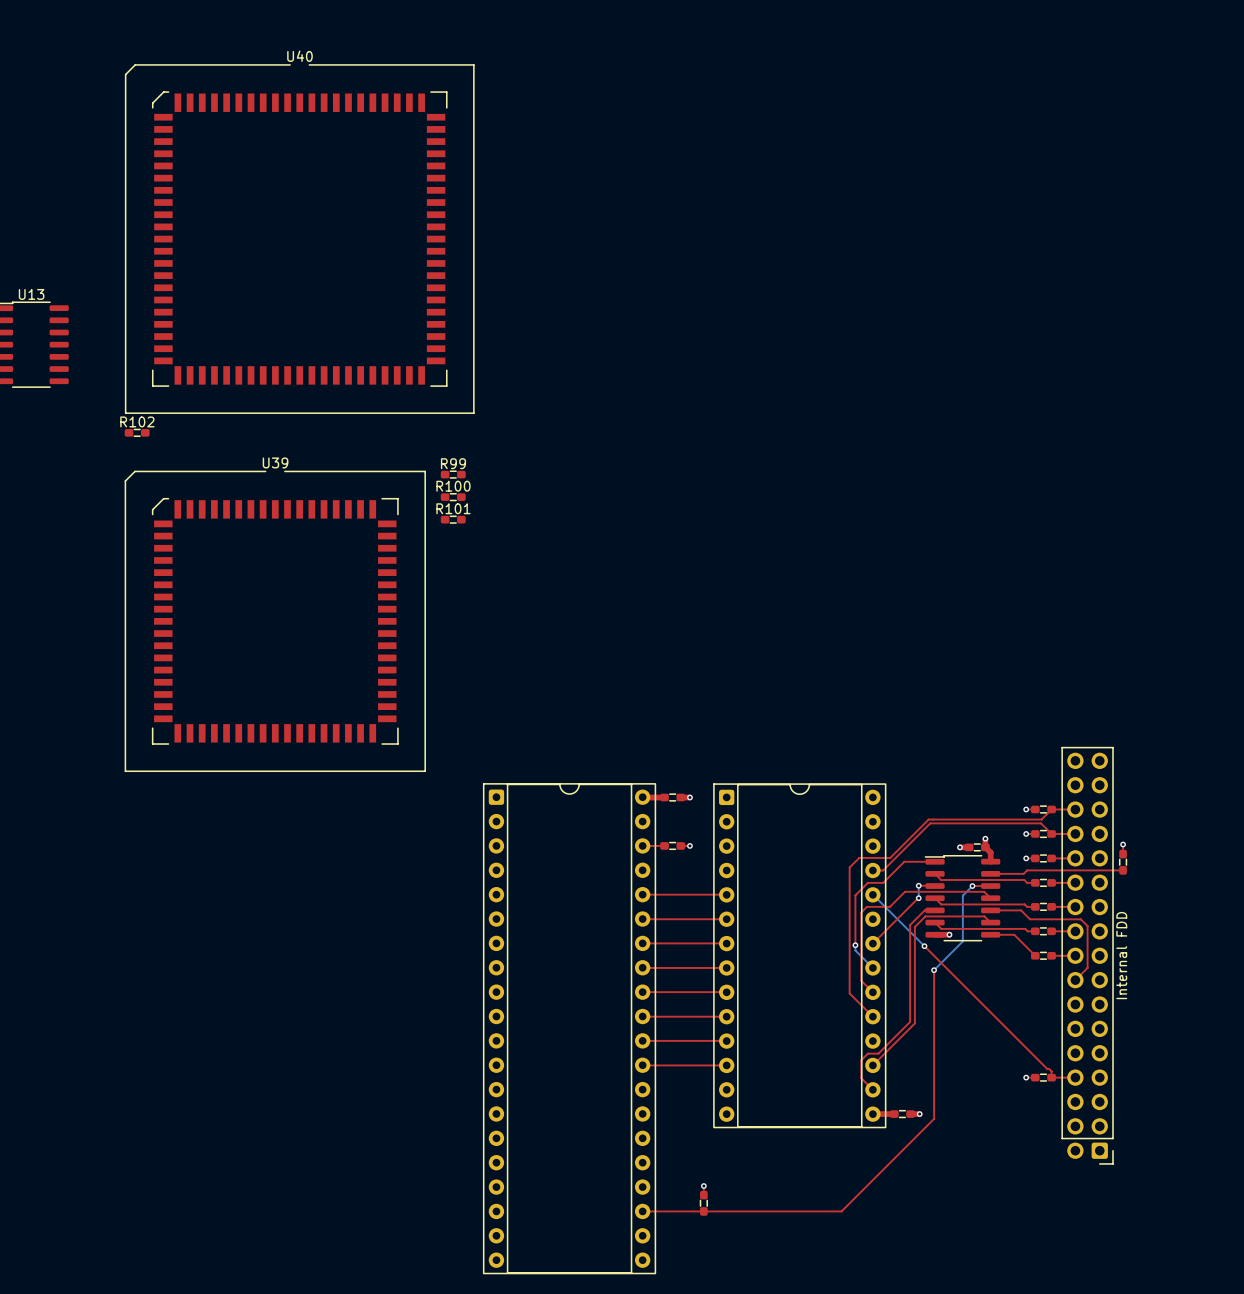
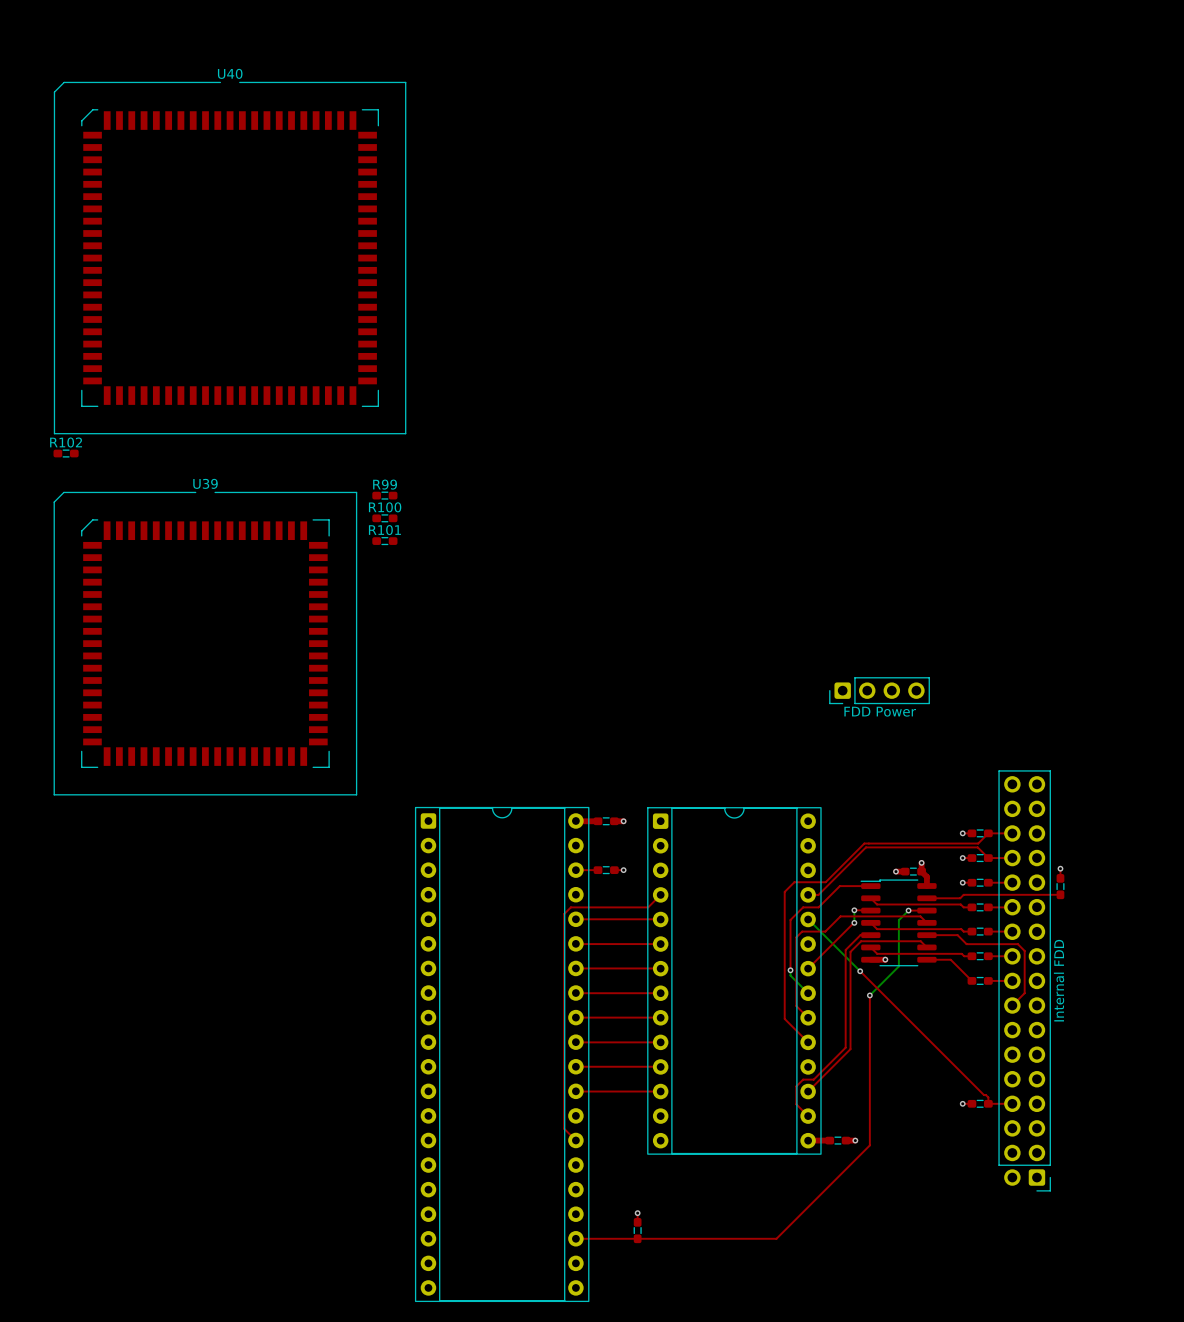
part: none -> FDD Power (879, 690)
top track: none -> (660, 894) (648, 907) (570, 907) (564, 914) (564, 1128) (575, 1140)

